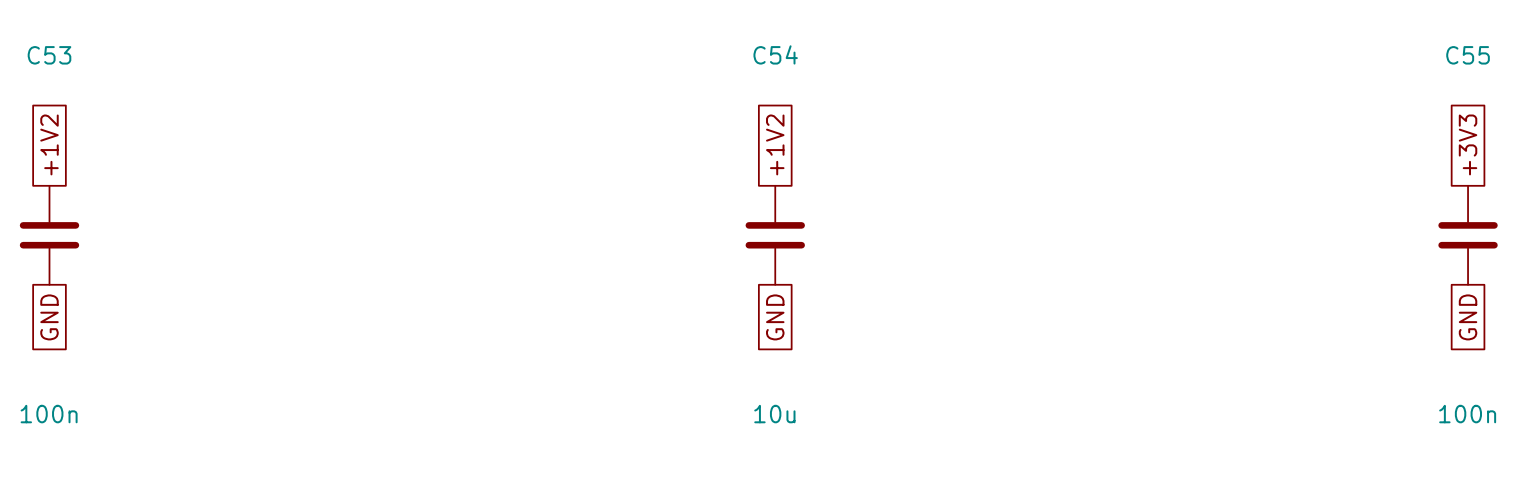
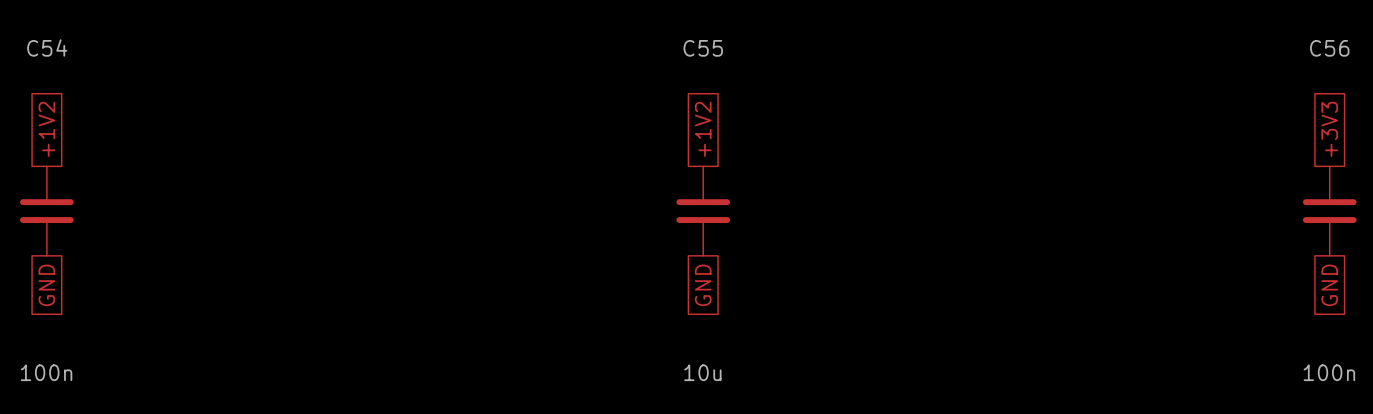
C54 name: C54 (775, 54) -> C55 (703, 48)
C53 name: C53 (49, 55) -> C54 (47, 47)
C55 name: C55 (1468, 55) -> C56 (1329, 48)

